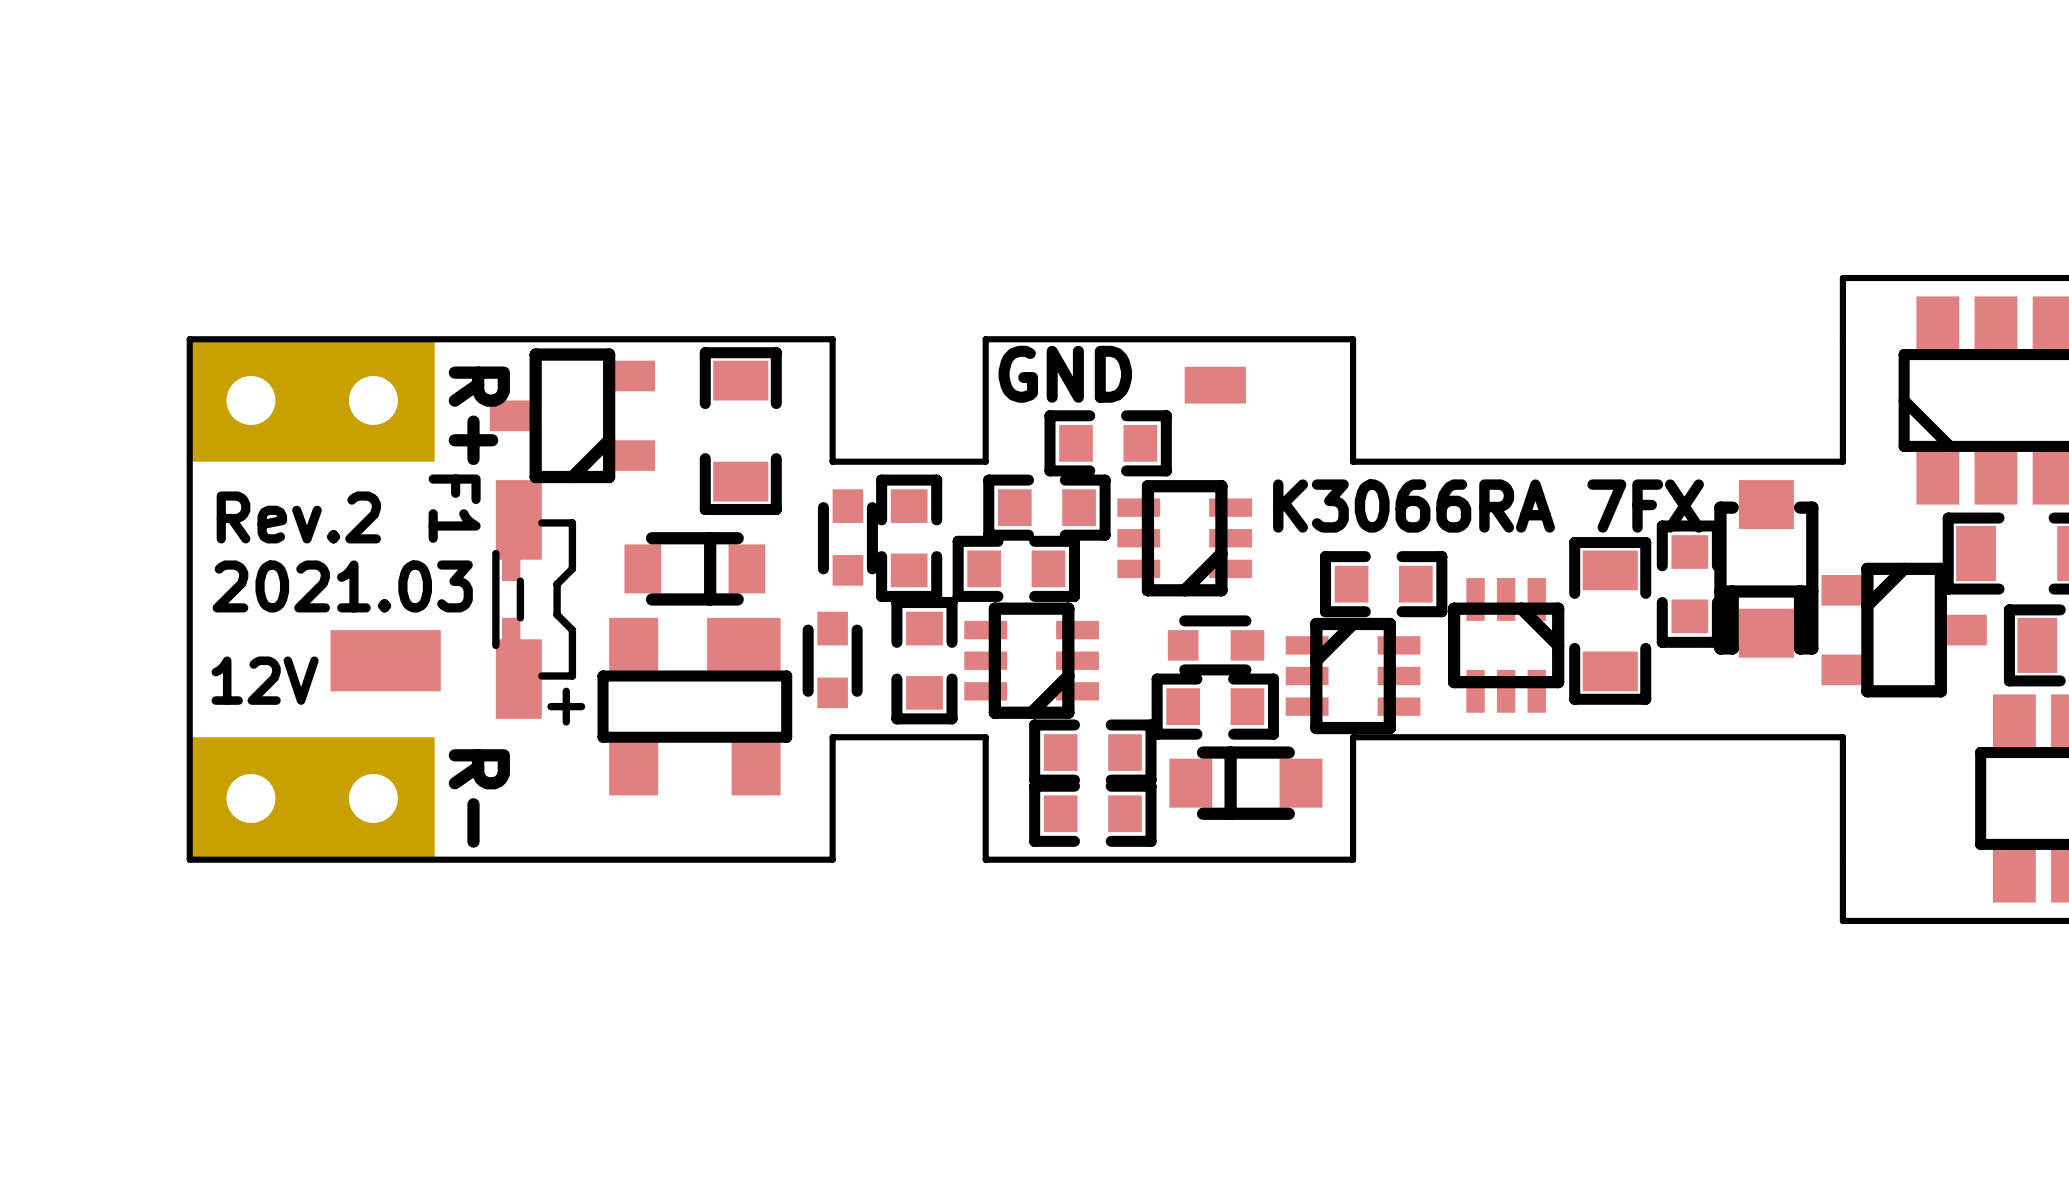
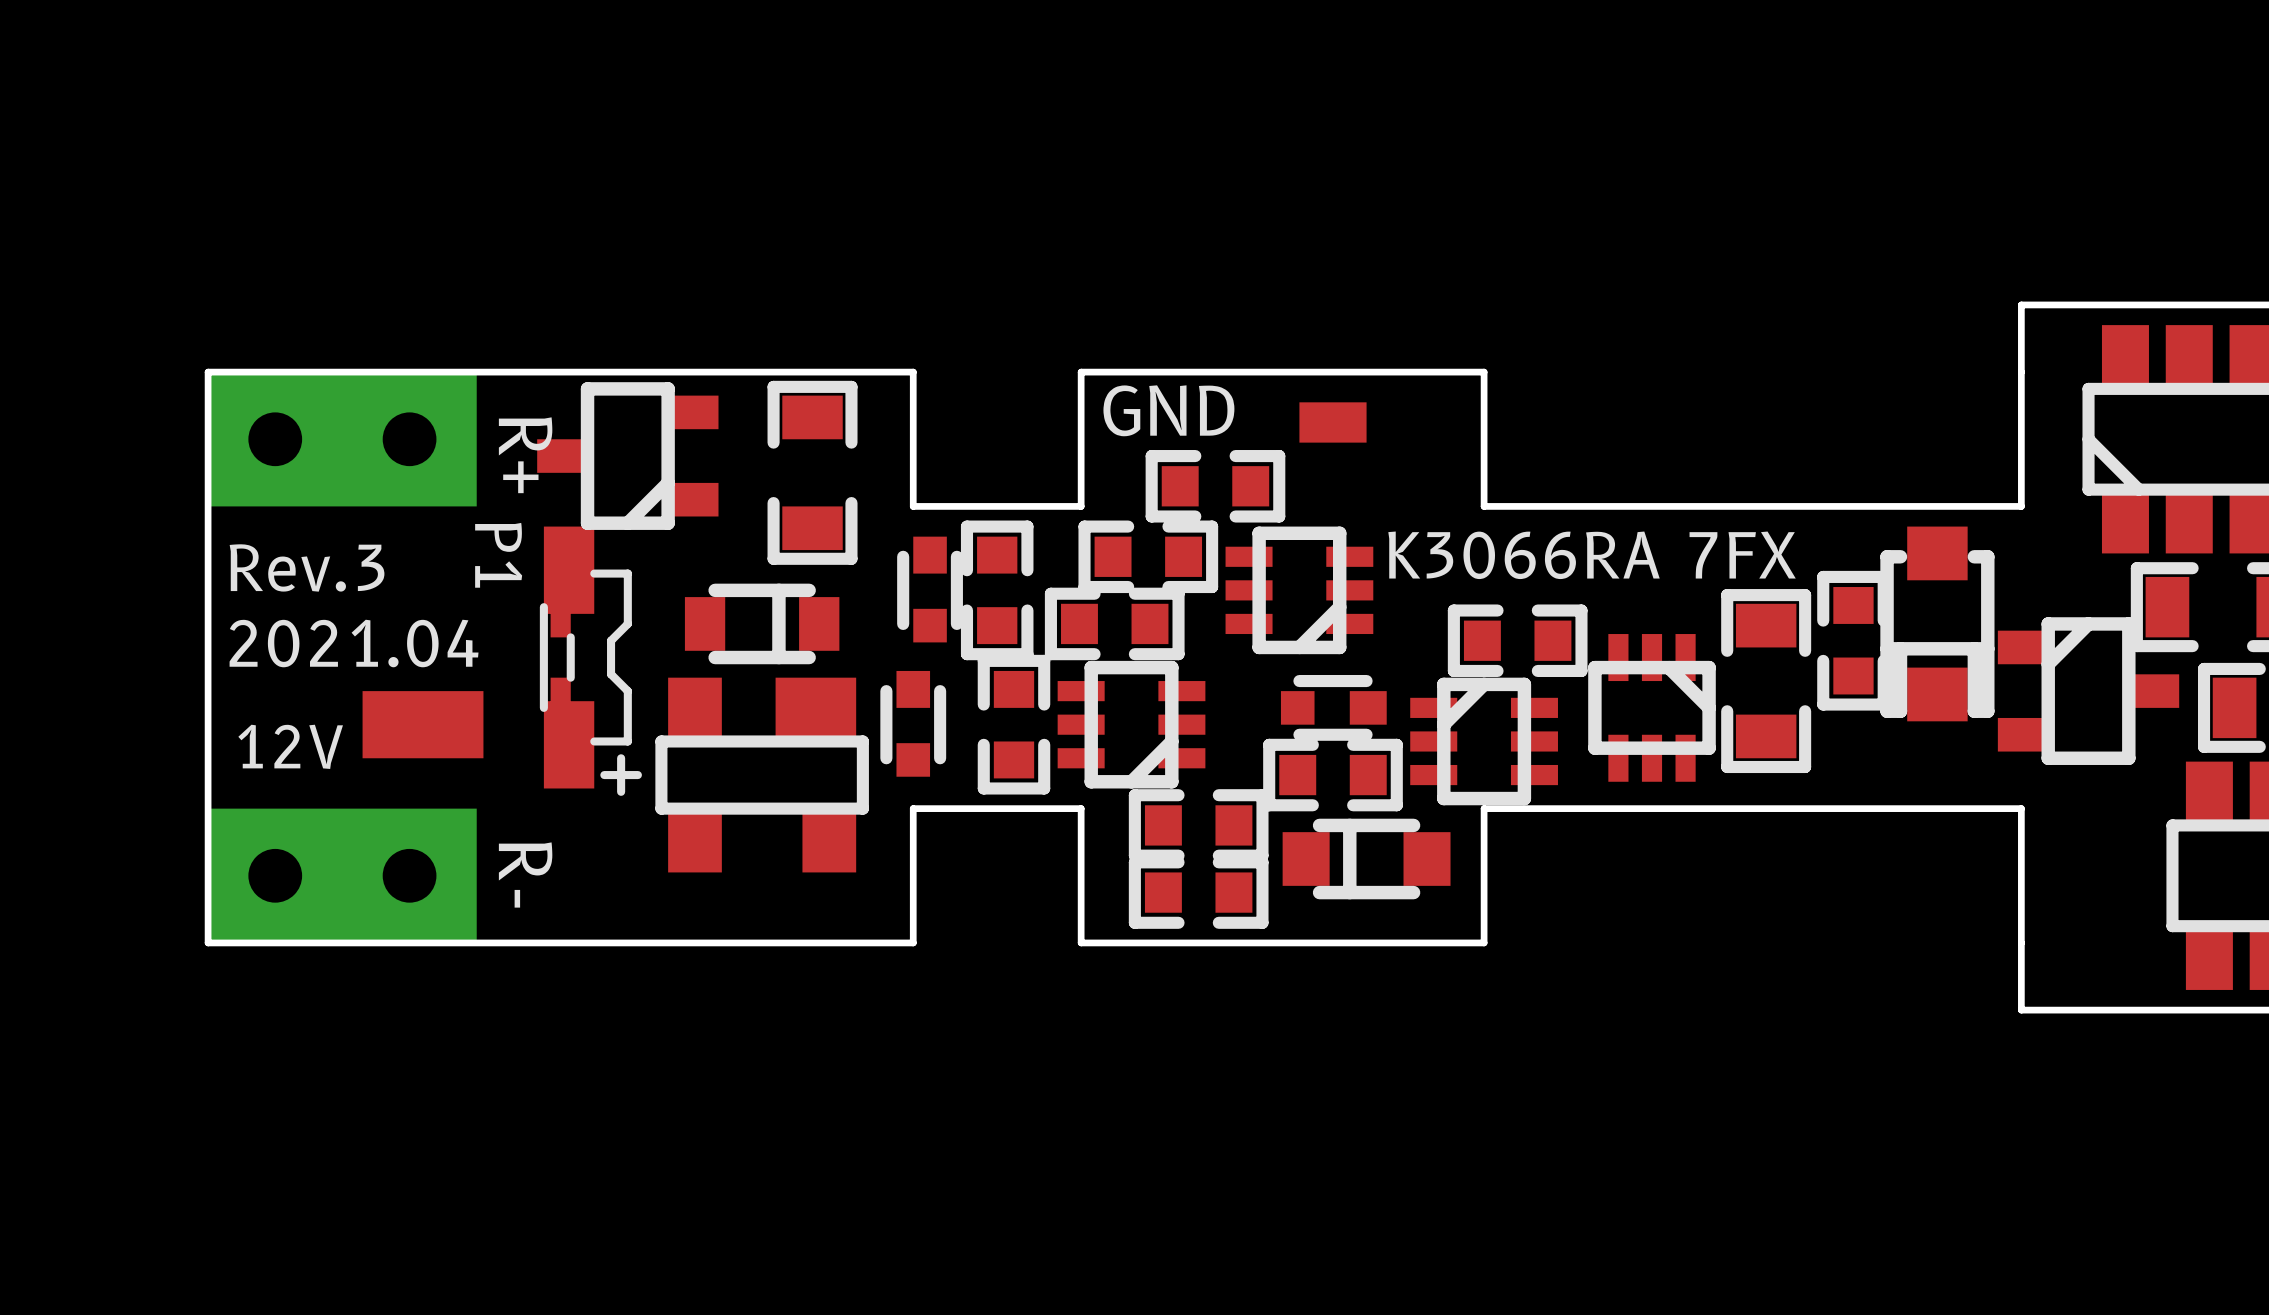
text: F1 (454, 508) -> P1 (498, 555)
text: Rev.2 (298, 517) -> Rev.3 (307, 567)
text: 2021.03 (342, 586) -> 2021.04 (354, 643)

